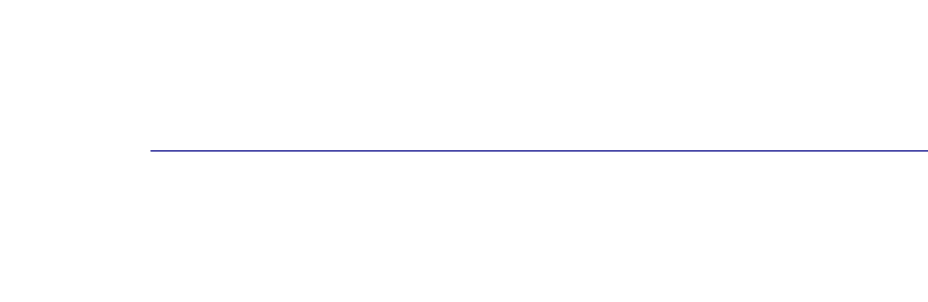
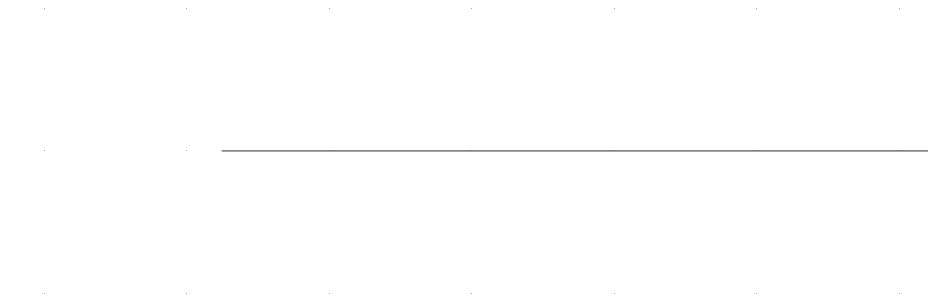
line: (150, 150) (222, 150) -> none

